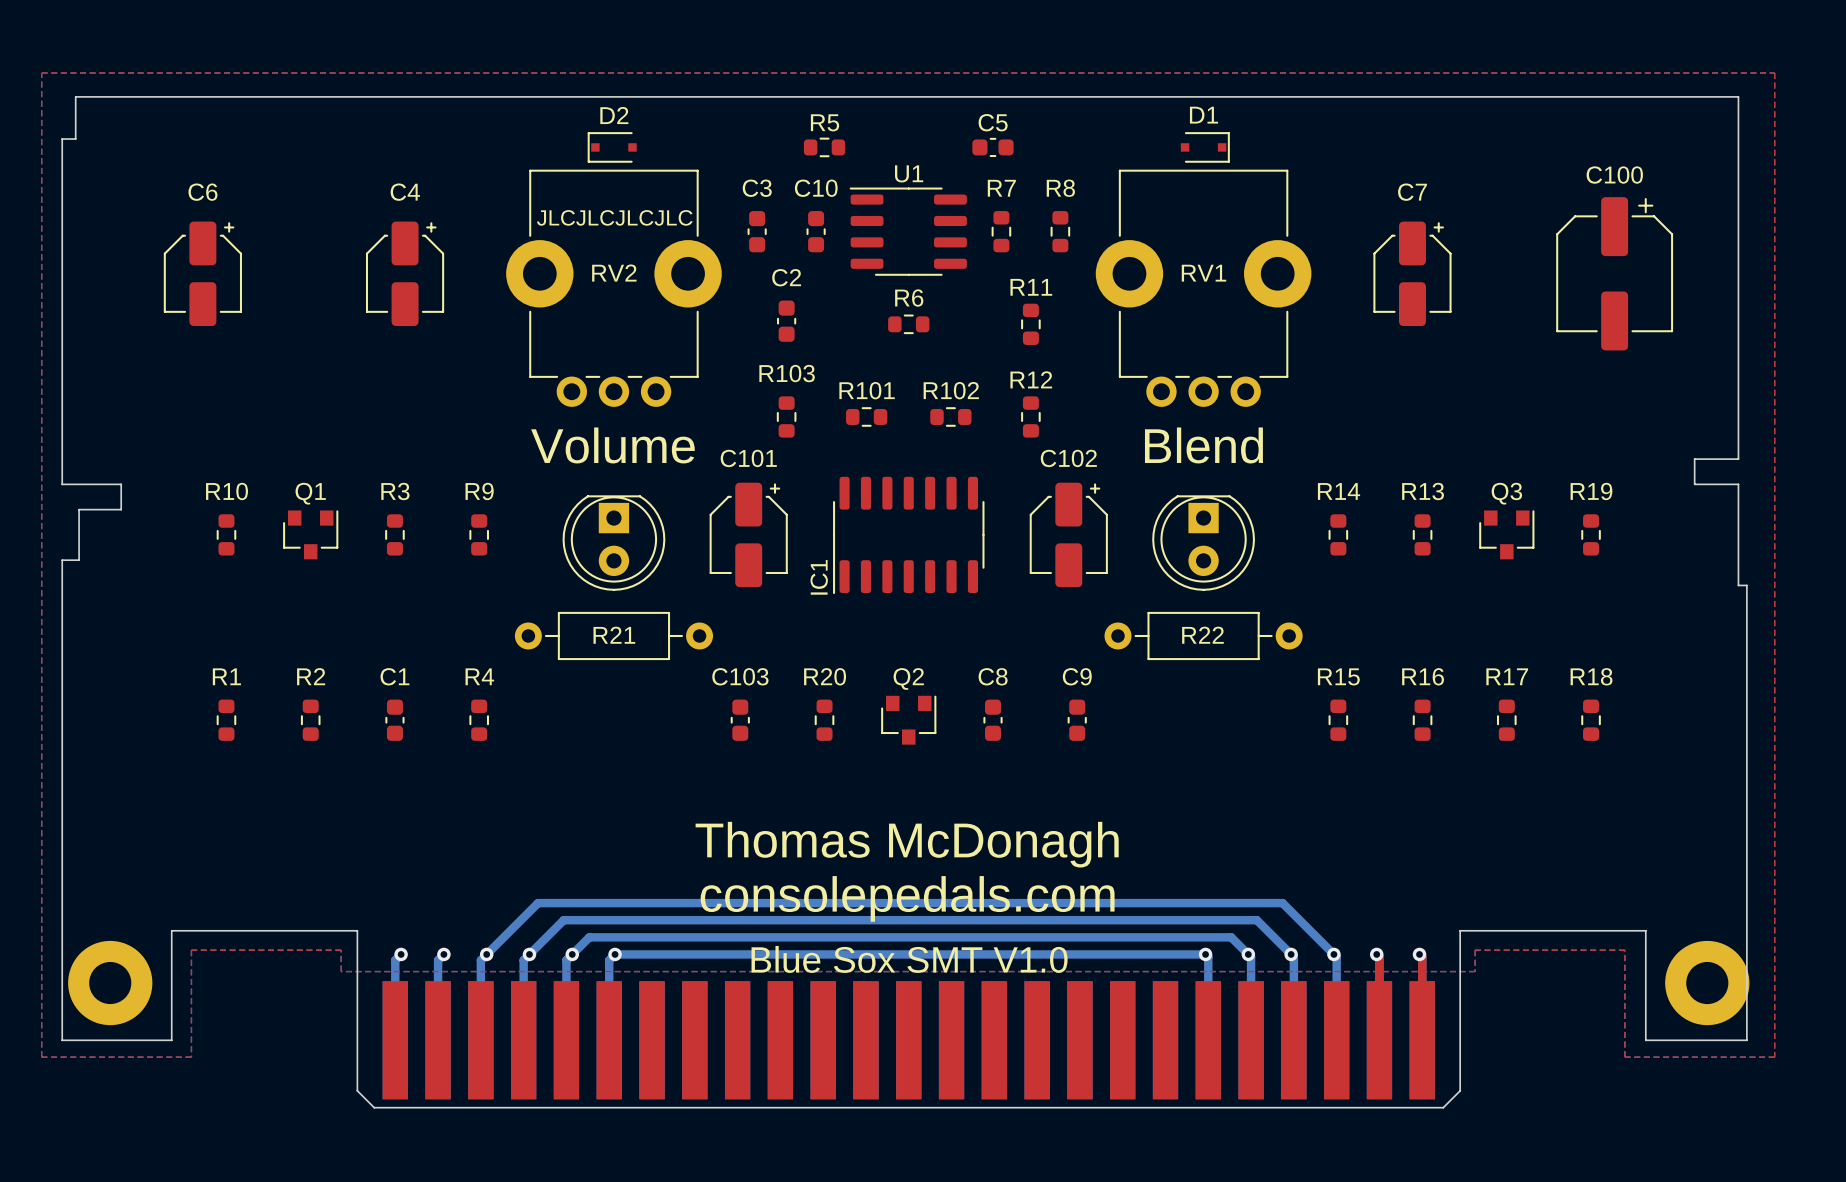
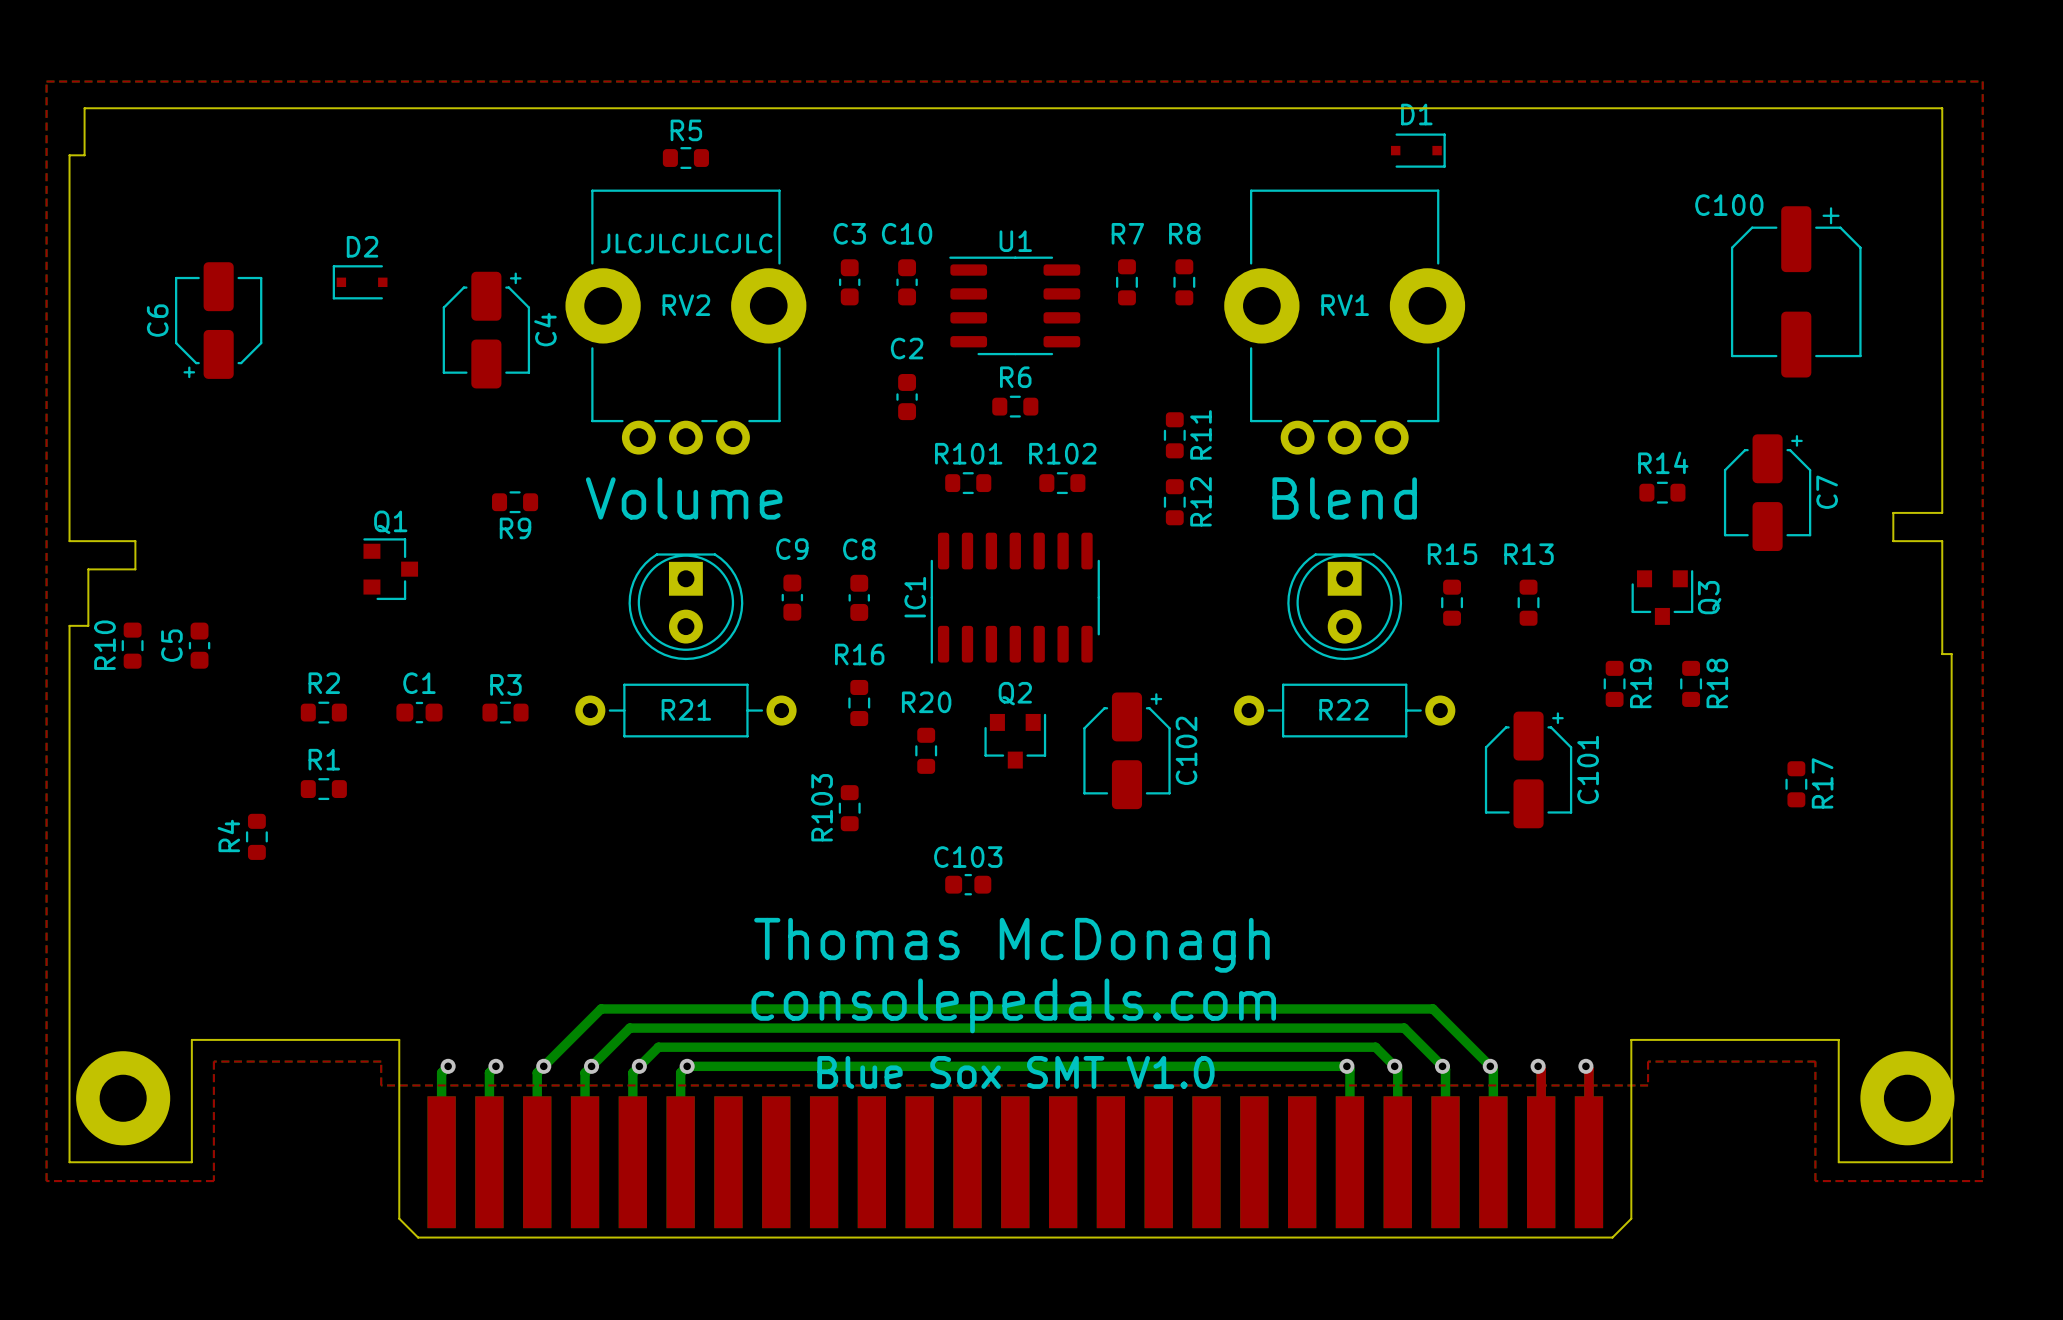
C5 name position: C5 (993, 122) -> C5 (171, 645)
D2 position: (612, 147) -> (360, 282)
R5 position: (824, 147) -> (685, 158)
C5 rotation: 0° (992, 147) -> 90° clockwise (199, 645)
C5 position: (992, 147) -> (199, 645)
D1 position: (1205, 147) -> (1418, 150)
C100 name position: C100 (1614, 175) -> C100 (1729, 205)
C6 name position: C6 (202, 192) -> C6 (157, 320)
C4 name rotation: 0° (405, 192) -> 90° counterclockwise (545, 329)
C4 name position: C4 (405, 192) -> C4 (545, 329)
C7 name rotation: 0° (1412, 192) -> 90° counterclockwise (1827, 492)
C7 name position: C7 (1412, 192) -> C7 (1827, 492)
C3 position: (757, 231) -> (849, 282)
C10 position: (816, 231) -> (907, 282)
U1 position: (908, 231) -> (1014, 305)
R7 position: (1001, 231) -> (1126, 282)
R8 position: (1060, 231) -> (1184, 282)
C6 rotation: 0° (202, 273) -> 180° (218, 320)
C4 position: (405, 273) -> (486, 330)
C7 position: (1412, 273) -> (1767, 492)
C100 position: (1614, 273) -> (1796, 291)
R11 name rotation: 0° (1031, 287) -> 90° counterclockwise (1201, 434)
C2 position: (786, 321) -> (907, 397)
R6 position: (908, 324) -> (1015, 406)
R11 position: (1030, 324) -> (1174, 435)
R103 name rotation: 0° (787, 373) -> 90° counterclockwise (822, 807)
R12 name rotation: 0° (1031, 379) -> 90° counterclockwise (1201, 501)
R103 position: (786, 416) -> (849, 808)
R101 position: (866, 416) -> (968, 483)
R102 position: (950, 416) -> (1062, 483)
R12 position: (1030, 416) -> (1174, 502)
C101 name rotation: 0° (748, 458) -> 90° counterclockwise (1588, 769)
C101 name position: C101 (748, 458) -> C101 (1588, 769)
C102 name rotation: 0° (1068, 458) -> 90° counterclockwise (1186, 750)
C102 name position: C102 (1068, 458) -> C102 (1186, 750)
R10 name rotation: 0° (227, 491) -> 90° counterclockwise (104, 645)
R9 name position: R9 (479, 491) -> R9 (515, 528)
R19 name rotation: 0° (1591, 491) -> 90° counterclockwise (1640, 683)
Q3 name rotation: 0° (1506, 493) -> 90° counterclockwise (1709, 597)
Q3 name position: Q3 (1506, 493) -> Q3 (1709, 597)
R10 position: (226, 534) -> (132, 645)
Q1 rotation: 0° (310, 534) -> 90° counterclockwise (390, 569)
Q1 position: (310, 534) -> (390, 569)
R3 rotation: 0° (394, 534) -> 90° clockwise (505, 712)
R3 position: (394, 534) -> (505, 712)
R9 rotation: 0° (479, 534) -> 90° clockwise (515, 502)
R9 position: (479, 534) -> (515, 502)
C101 position: (748, 534) -> (1528, 769)
C102 position: (1068, 534) -> (1126, 750)
R14 rotation: 0° (1338, 534) -> 90° clockwise (1662, 492)
R14 position: (1338, 534) -> (1662, 492)
R13 position: (1422, 534) -> (1528, 602)
Q3 position: (1506, 534) -> (1662, 597)
R19 position: (1591, 534) -> (1614, 683)
IC1 name position: IC1 (819, 577) -> IC1 (915, 597)
R4 name rotation: 0° (479, 676) -> 90° counterclockwise (228, 835)
R4 name position: R4 (479, 676) -> R4 (228, 835)
R17 name rotation: 0° (1507, 676) -> 90° counterclockwise (1822, 783)
R18 name rotation: 0° (1591, 676) -> 90° counterclockwise (1717, 683)
R1 rotation: 0° (226, 720) -> 90° clockwise (323, 789)
R1 position: (226, 720) -> (323, 789)
R2 rotation: 0° (310, 720) -> 90° clockwise (323, 712)
R2 position: (310, 720) -> (323, 712)
C1 rotation: 0° (394, 720) -> 90° clockwise (419, 712)
C1 position: (394, 720) -> (419, 712)
R4 position: (479, 720) -> (256, 836)
C103 rotation: 0° (740, 720) -> 90° clockwise (968, 884)
C103 position: (740, 720) -> (968, 884)
R20 position: (824, 720) -> (926, 750)
Q2 position: (908, 720) -> (1015, 741)
C8 position: (992, 720) -> (859, 597)
C9 position: (1077, 720) -> (792, 597)
R15 position: (1338, 720) -> (1452, 602)
R16 position: (1422, 720) -> (859, 703)
R17 position: (1506, 720) -> (1796, 784)
R18 position: (1591, 720) -> (1691, 683)

